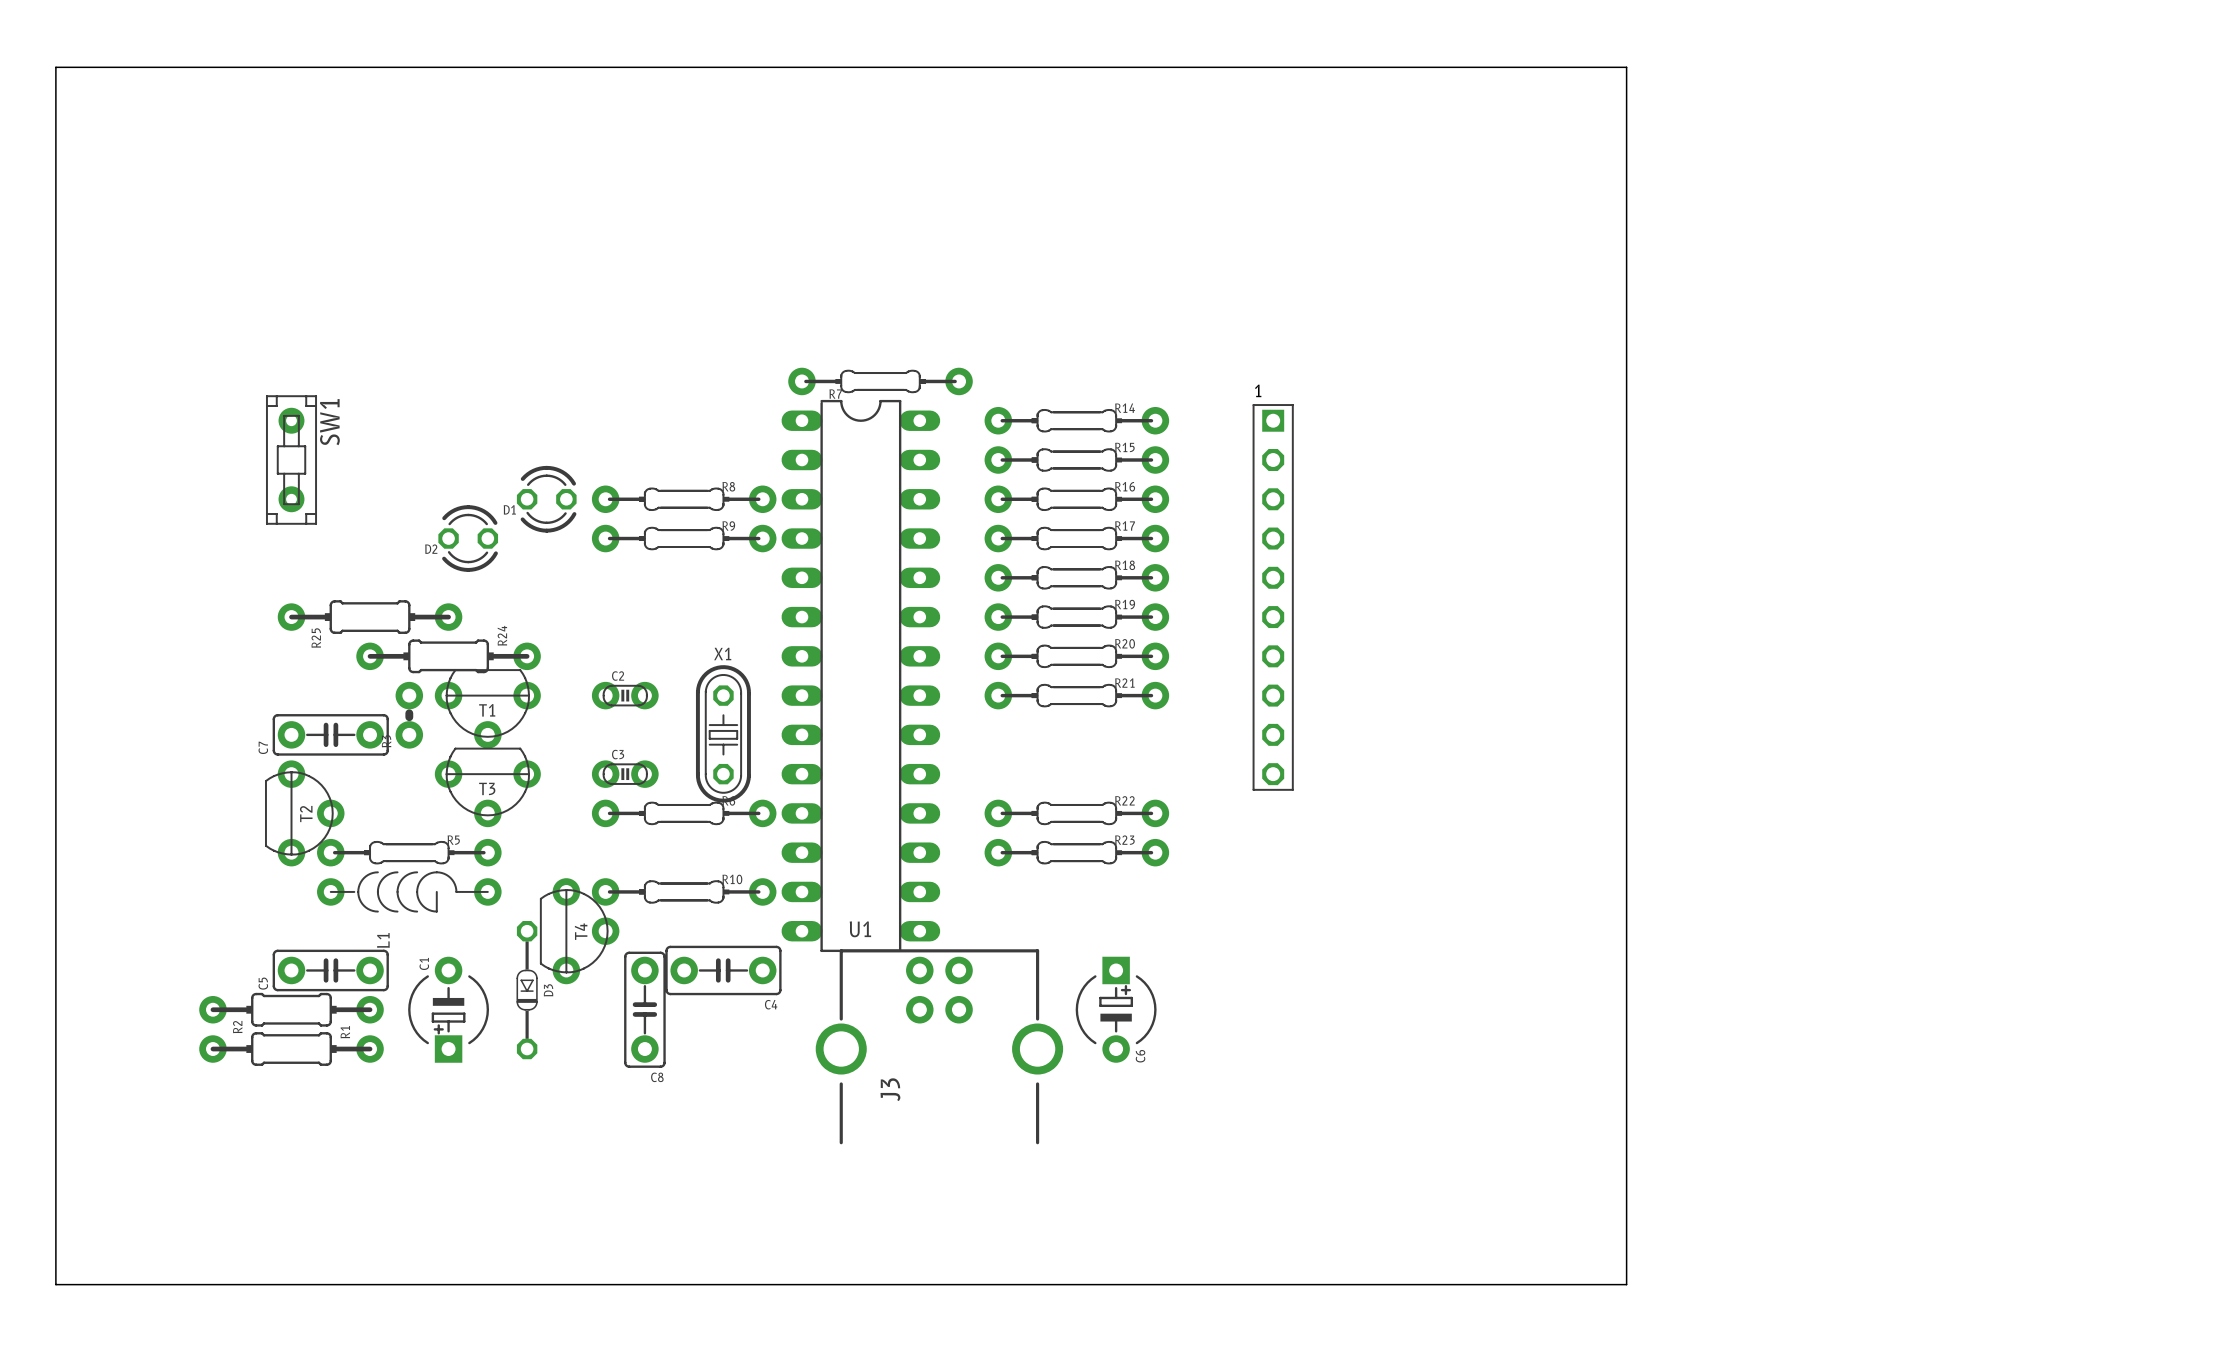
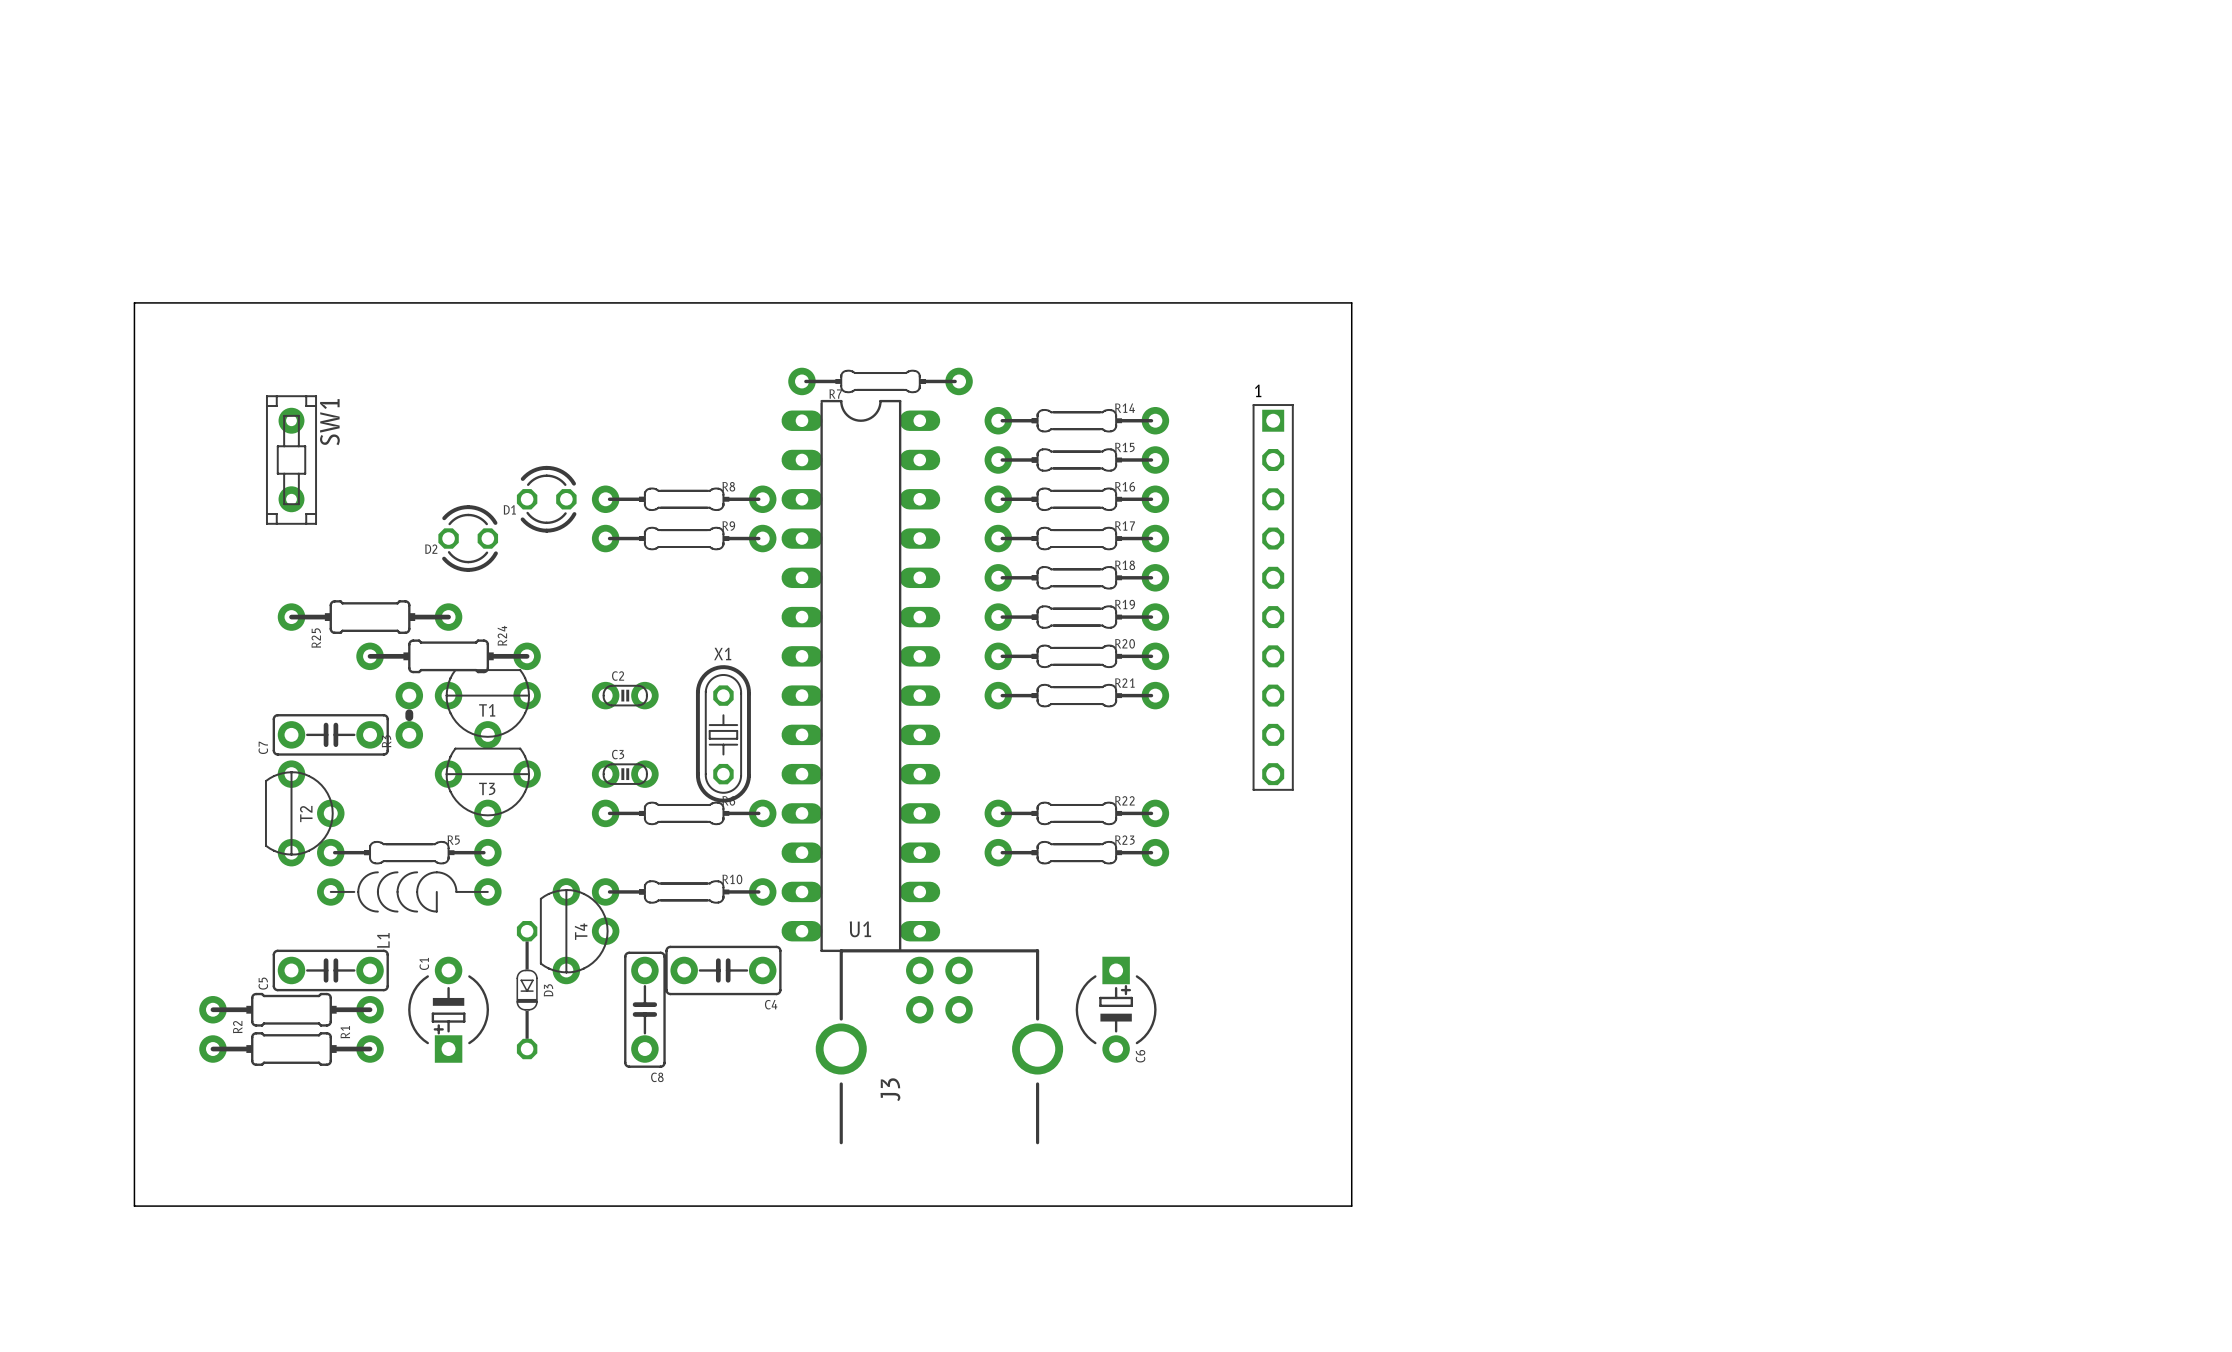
board edge: (55, 67) (1626, 67) (1626, 1284) (55, 1284) (55, 67) -> (134, 302) (134, 1206) (1351, 1206) (1351, 302) (134, 302)

